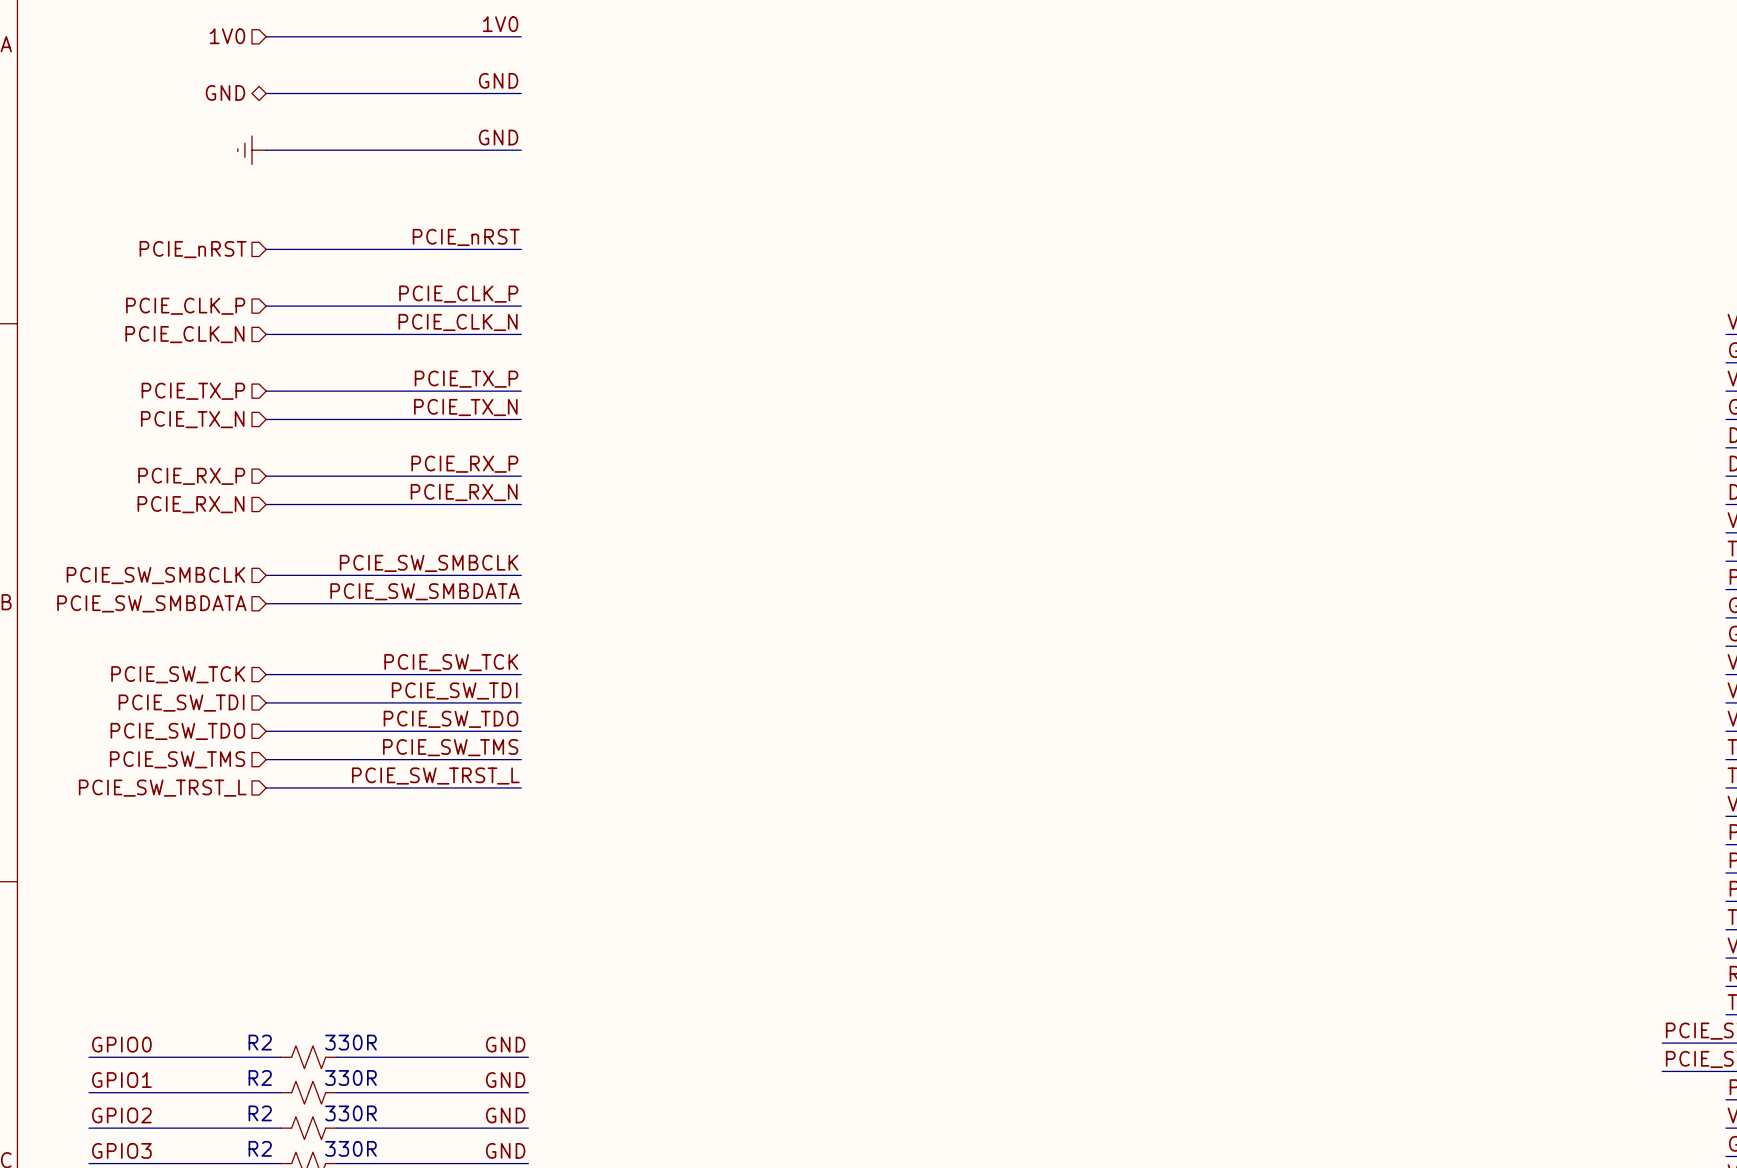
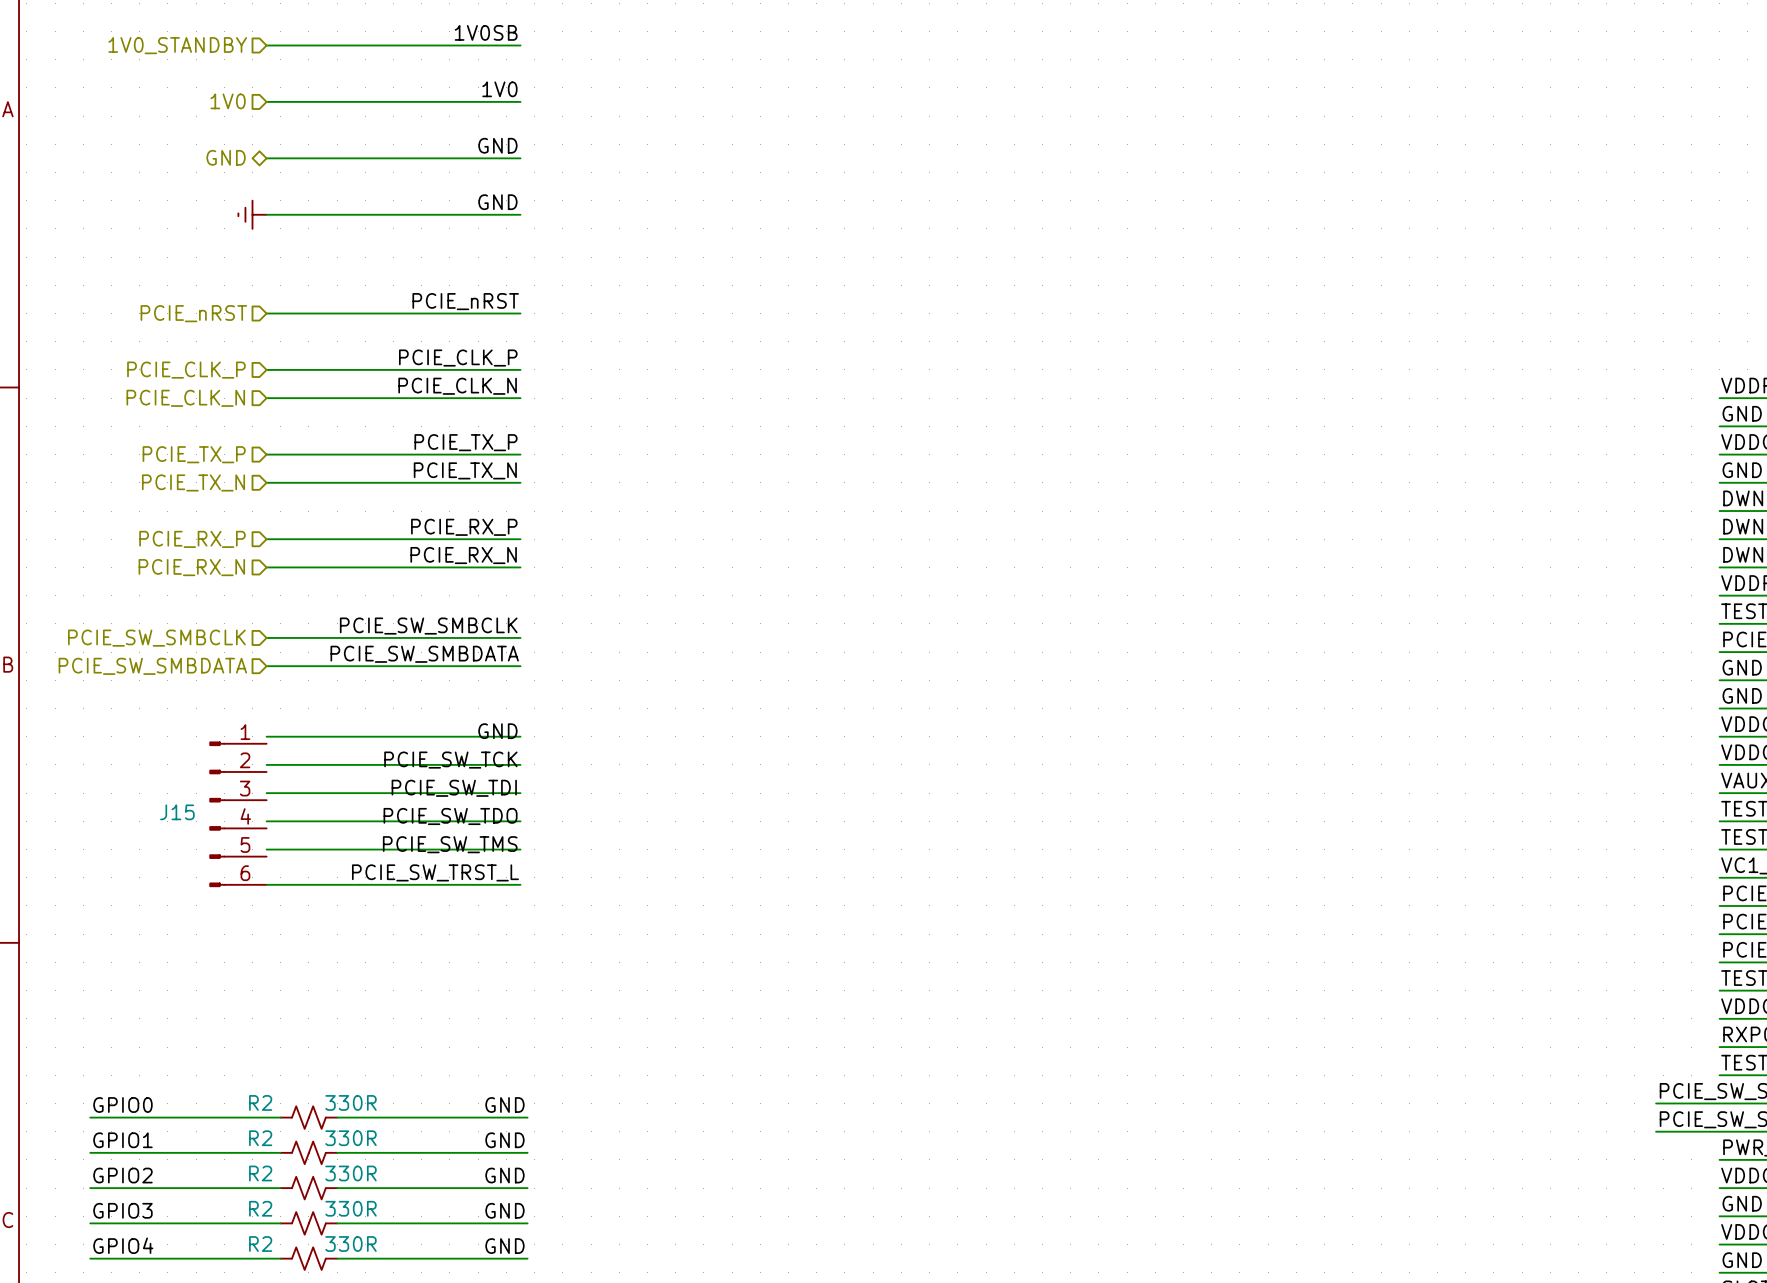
label position: PCIE_SW_TCK (451, 662) -> PCIE_SW_TCK (450, 760)
label: none -> GND (497, 731)
hierarchical label: PCIE_SW_TCK (178, 674) -> none
label position: PCIE_SW_TDI (454, 690) -> PCIE_SW_TDI (454, 788)
hierarchical label: PCIE_SW_TDI (181, 703) -> none
label position: PCIE_SW_TDO (450, 719) -> PCIE_SW_TDO (450, 816)
hierarchical label: PCIE_SW_TDO (177, 731) -> none
label position: PCIE_SW_TMS (450, 747) -> PCIE_SW_TMS (450, 844)
J15: none -> (237, 814)
hierarchical label: PCIE_SW_TMS (177, 759) -> none
label position: PCIE_SW_TRST_L (435, 776) -> PCIE_SW_TRST_L (435, 872)
hierarchical label: PCIE_SW_TRST_L (162, 788) -> none
wire: none -> (266, 884) (520, 884)

